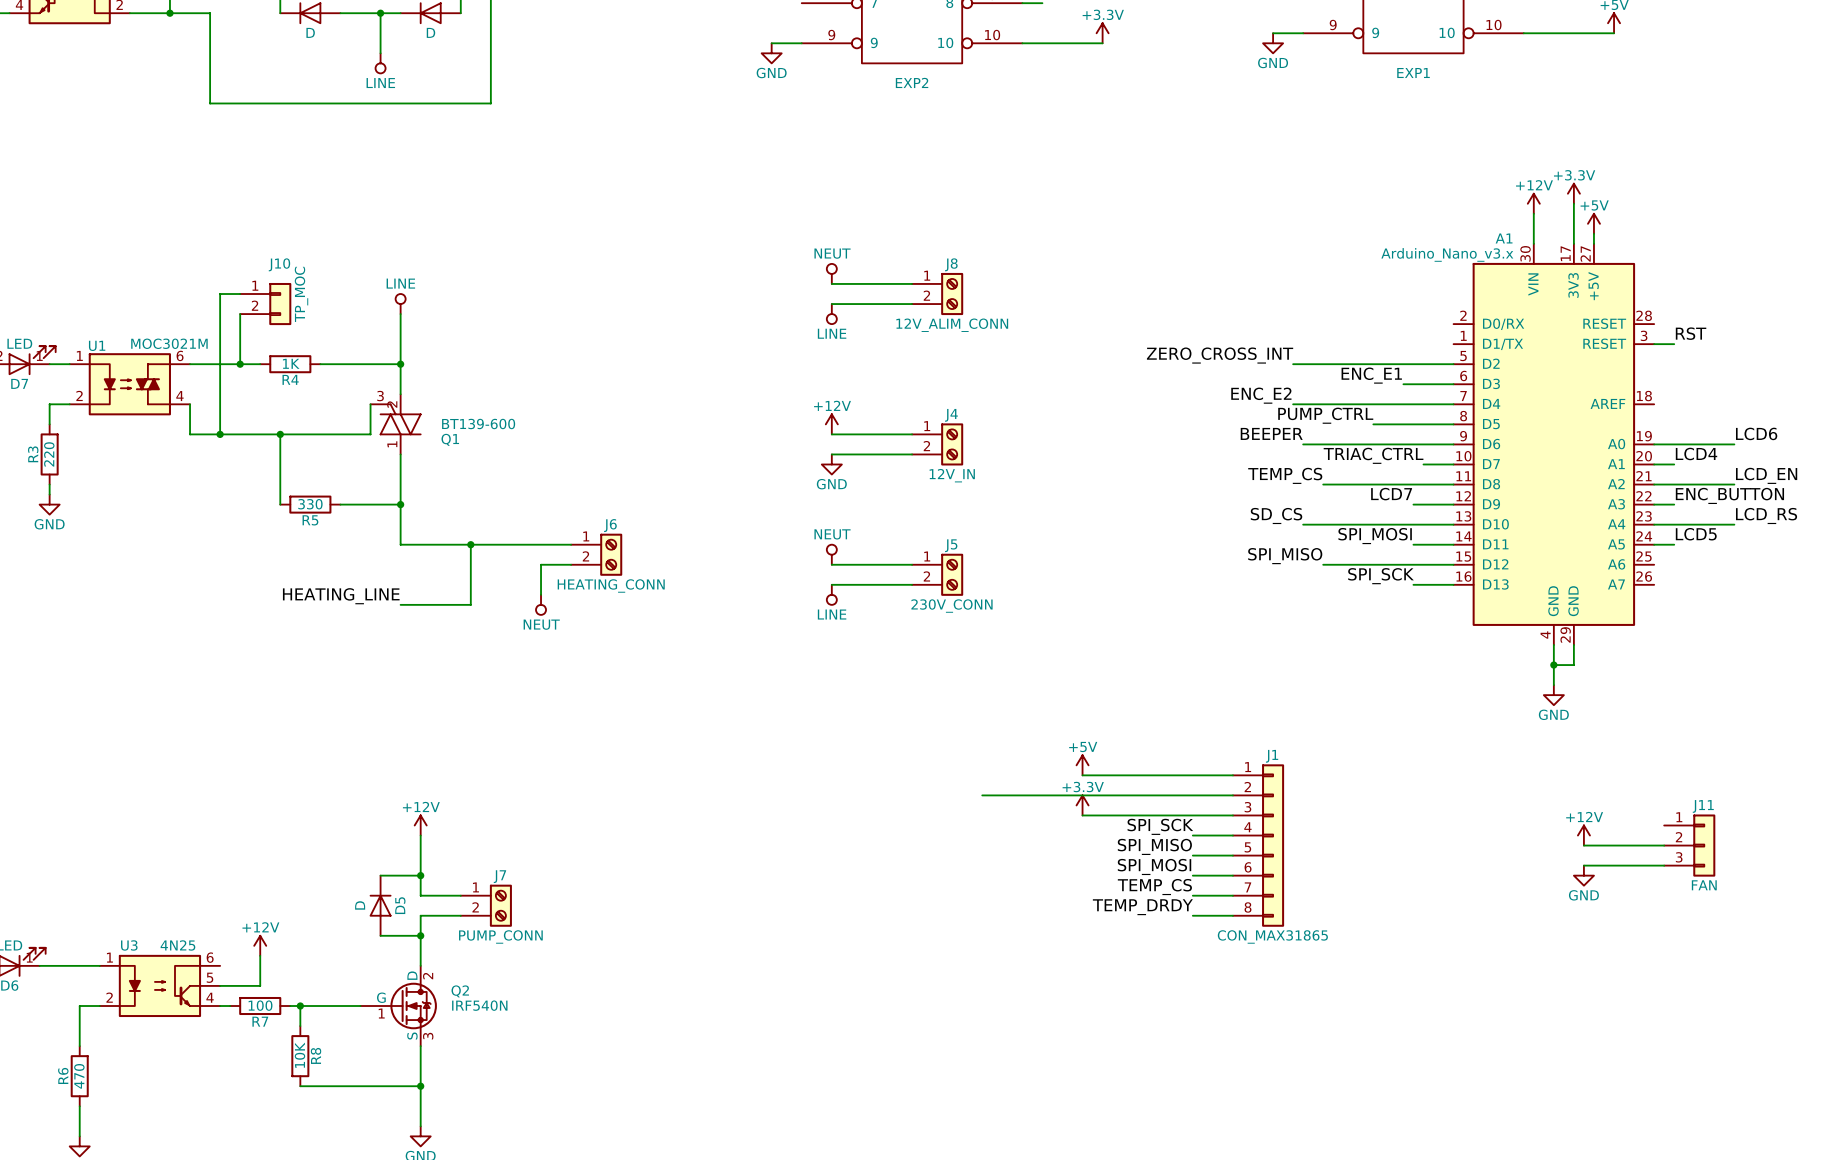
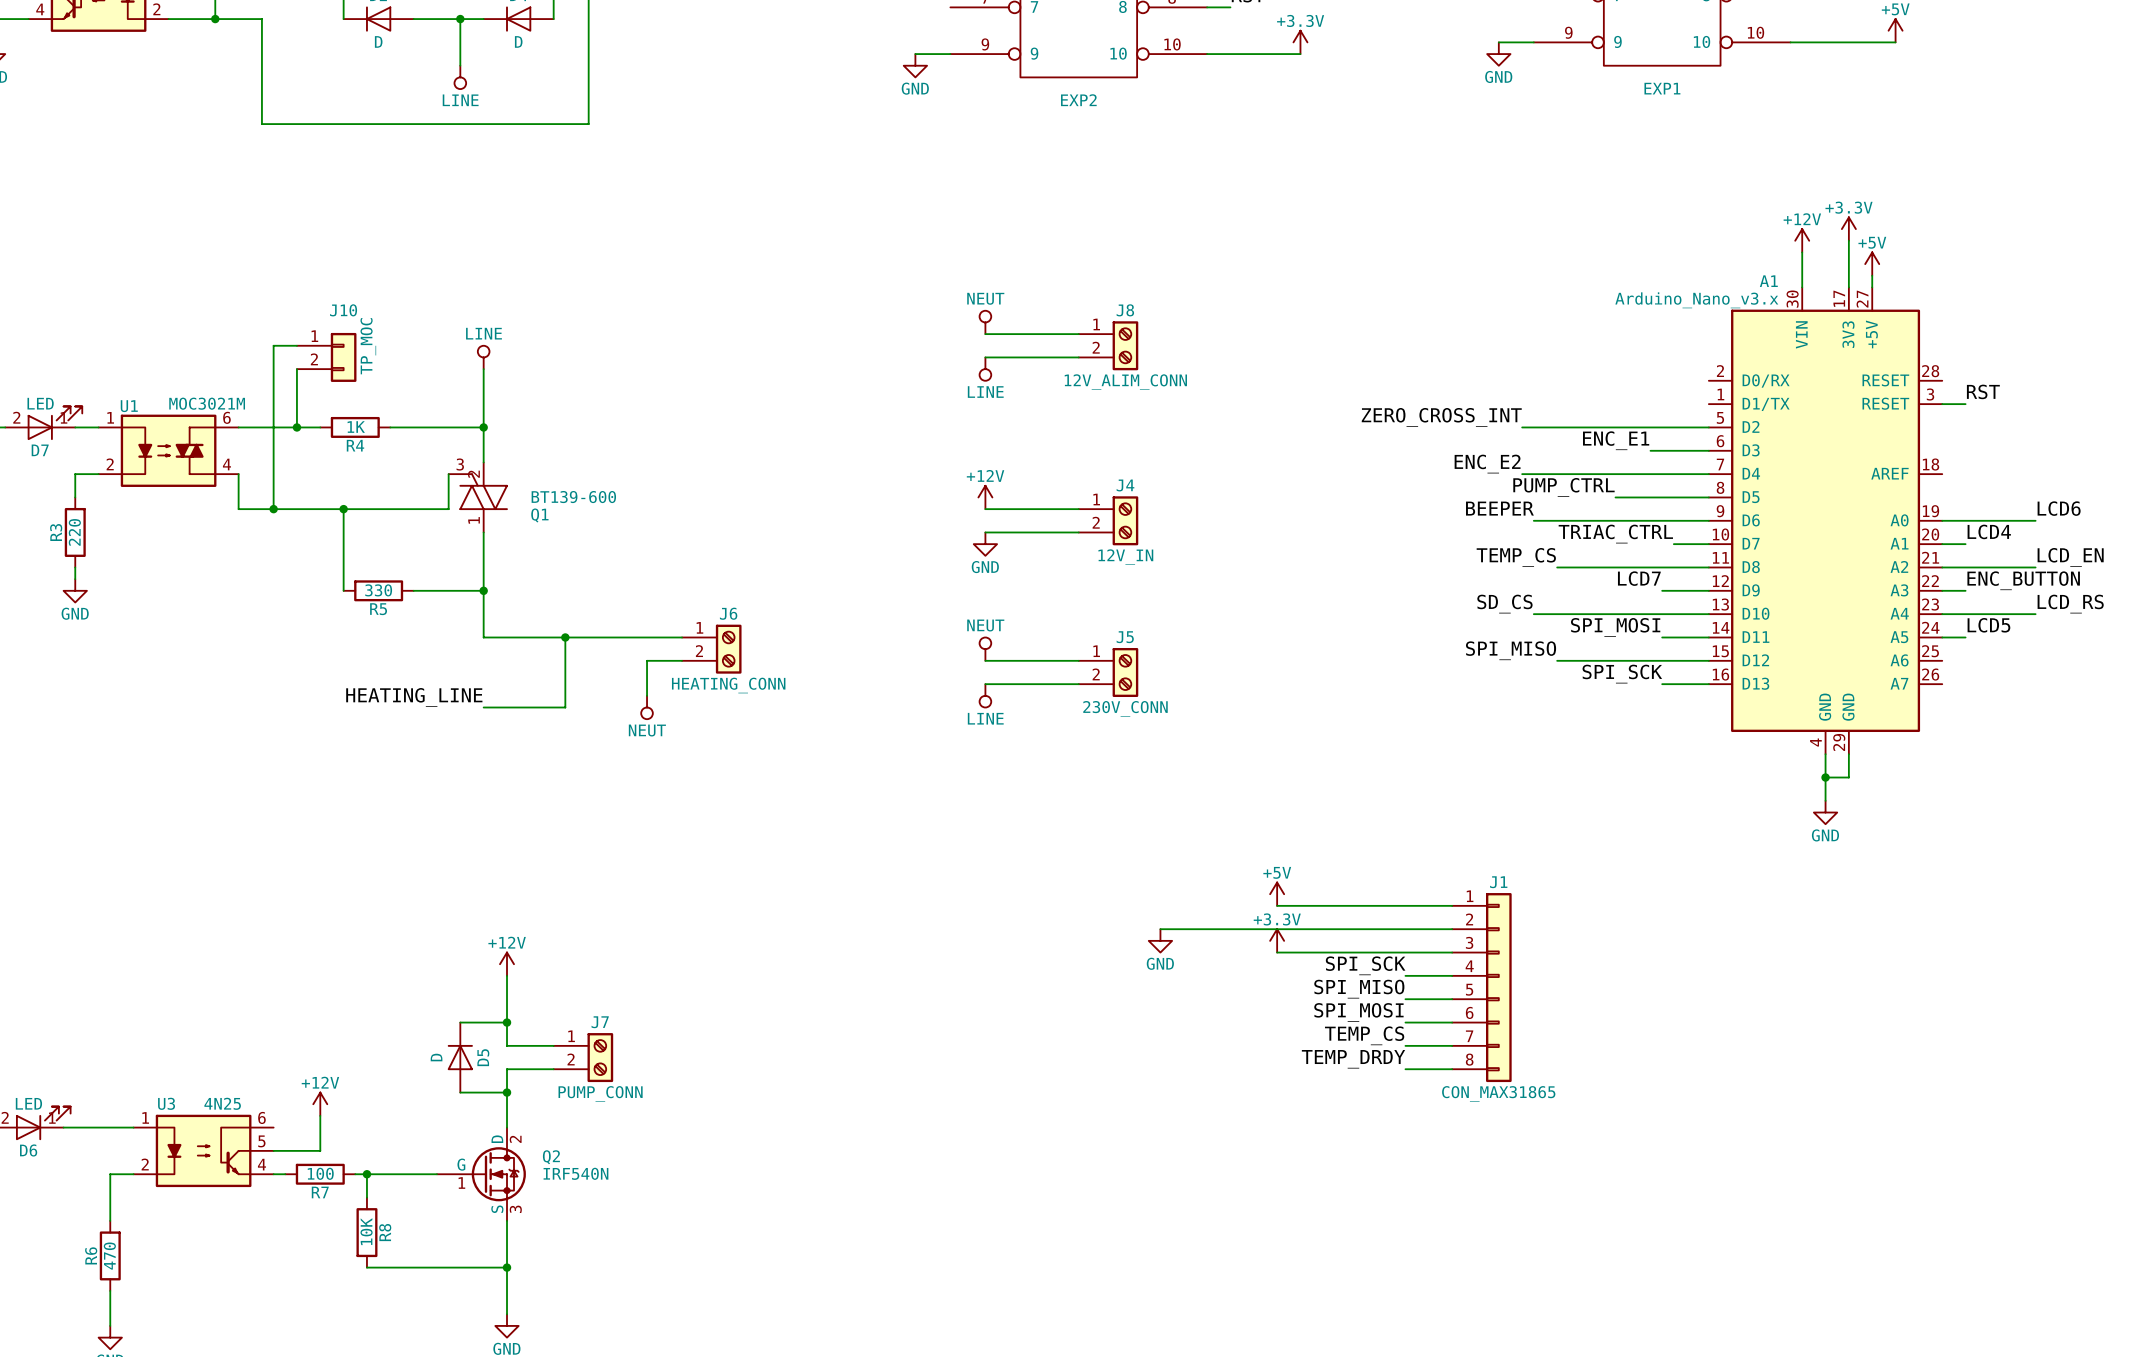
power symbol: none -> GND (1160, 940)
power symbol: +12V (1583, 835) -> none
wire: (1583, 845) (1664, 845) -> none
J11: FAN (1689, 845) -> none
wire: (1583, 865) (1664, 865) -> none
power symbol: GND (1583, 875) -> none

